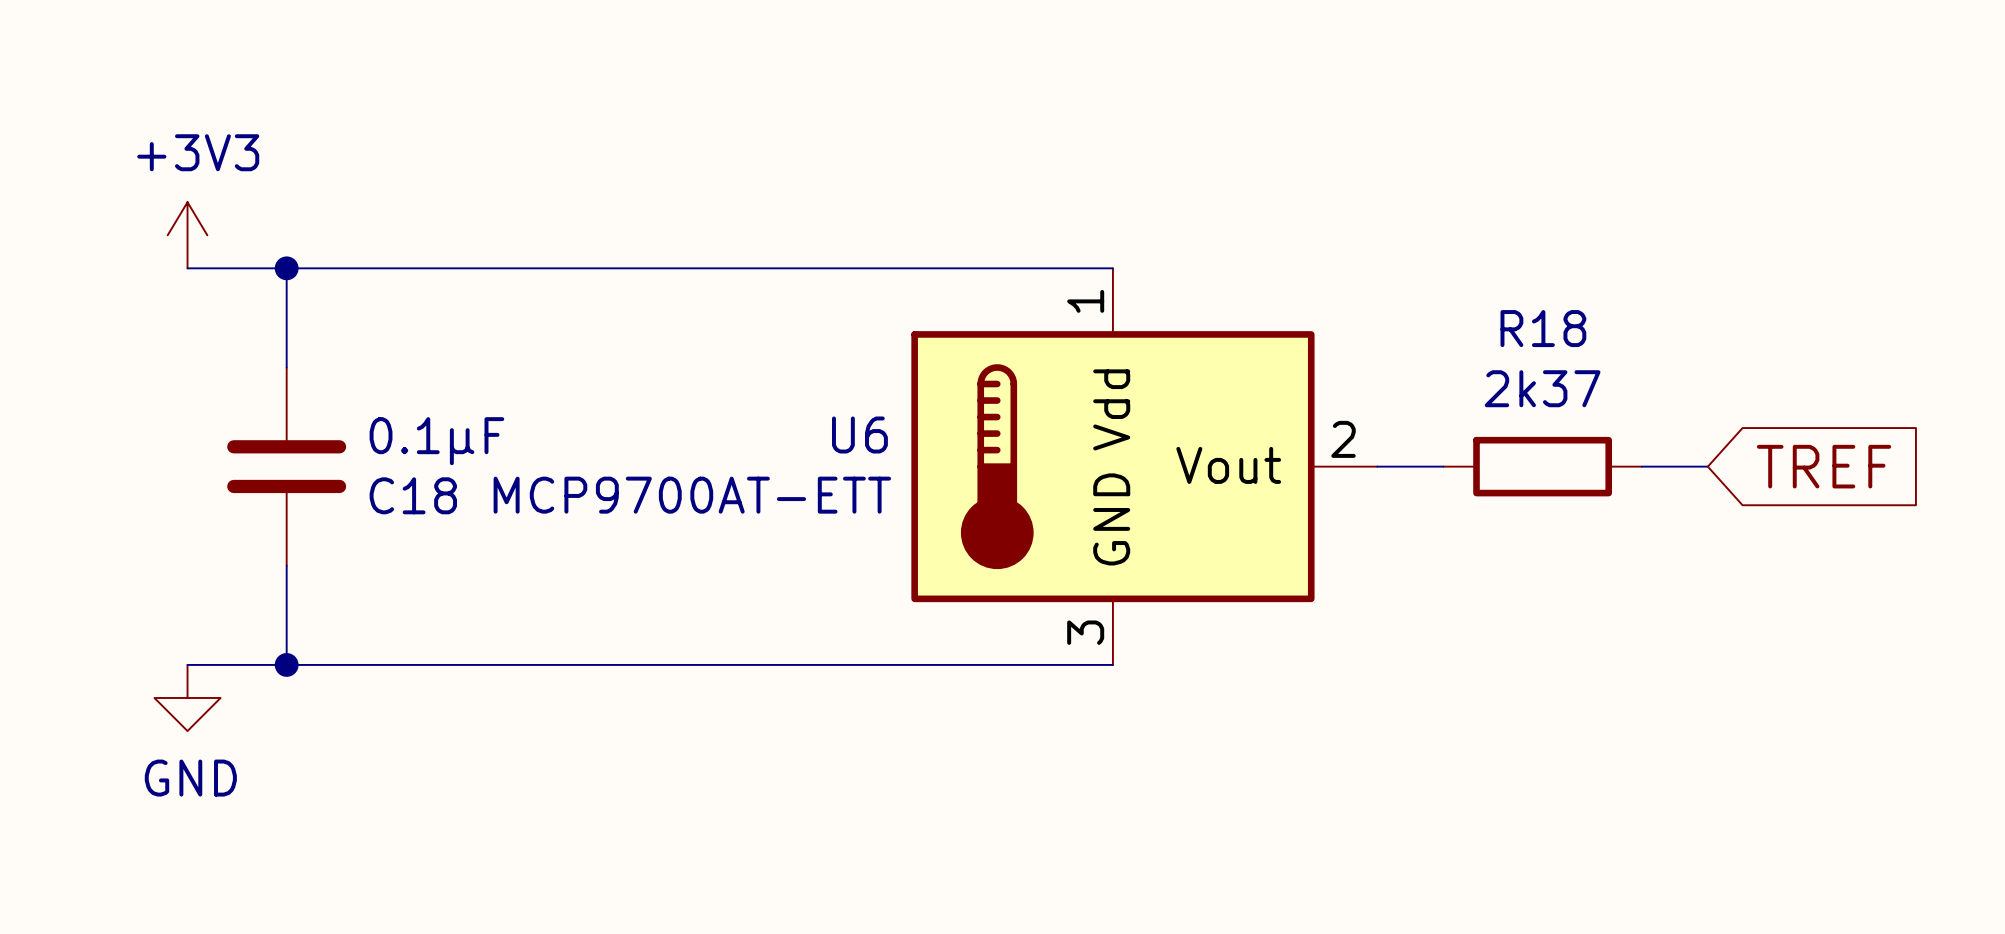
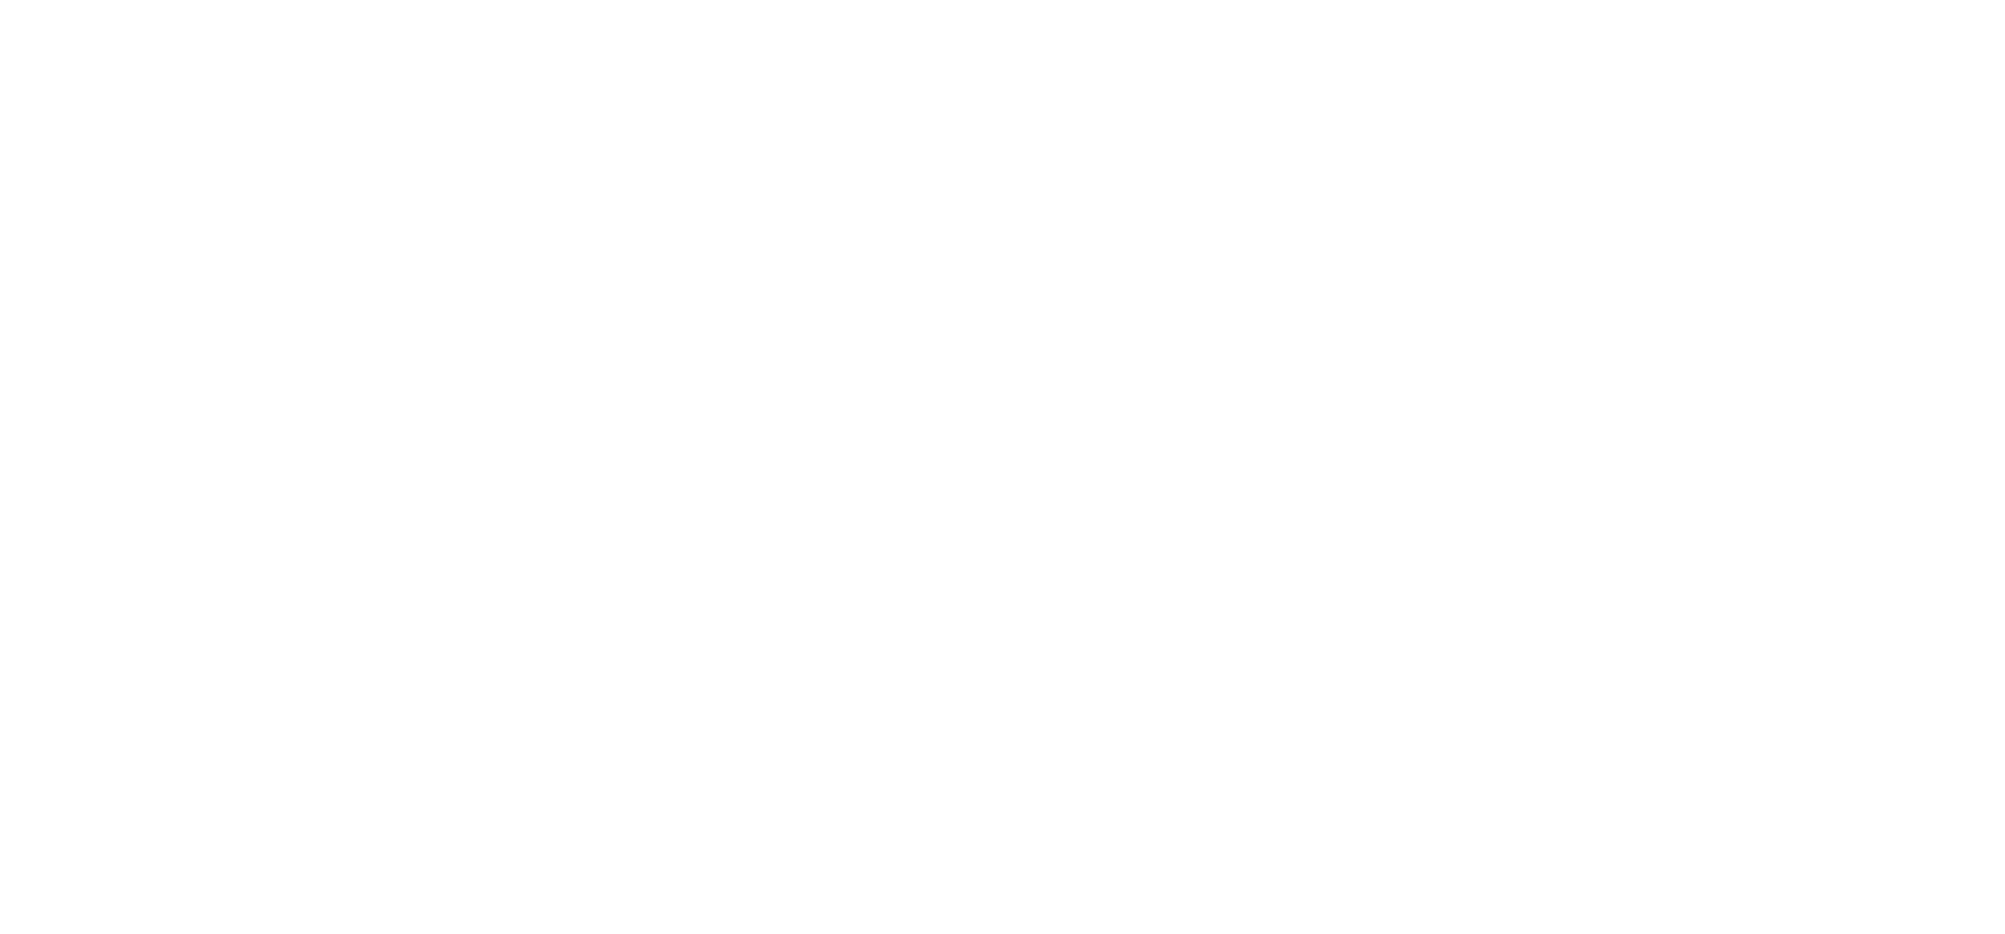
power symbol: +3V3 (187, 235) -> none
wire: (187, 268) (1112, 268) -> none
wire: (286, 268) (286, 367) -> none
junction: (286, 268) -> none
C18: 0.1μF (286, 466) -> none
U6: MCP9700AT-ETT (1144, 466) -> none
wire: (1377, 466) (1443, 466) -> none
R18: 2k37 (1542, 466) -> none
wire: (1641, 466) (1707, 466) -> none
global label: TREF (1824, 466) -> none
wire: (286, 565) (286, 664) -> none
wire: (187, 664) (1112, 664) -> none
junction: (286, 664) -> none
power symbol: GND (187, 697) -> none

